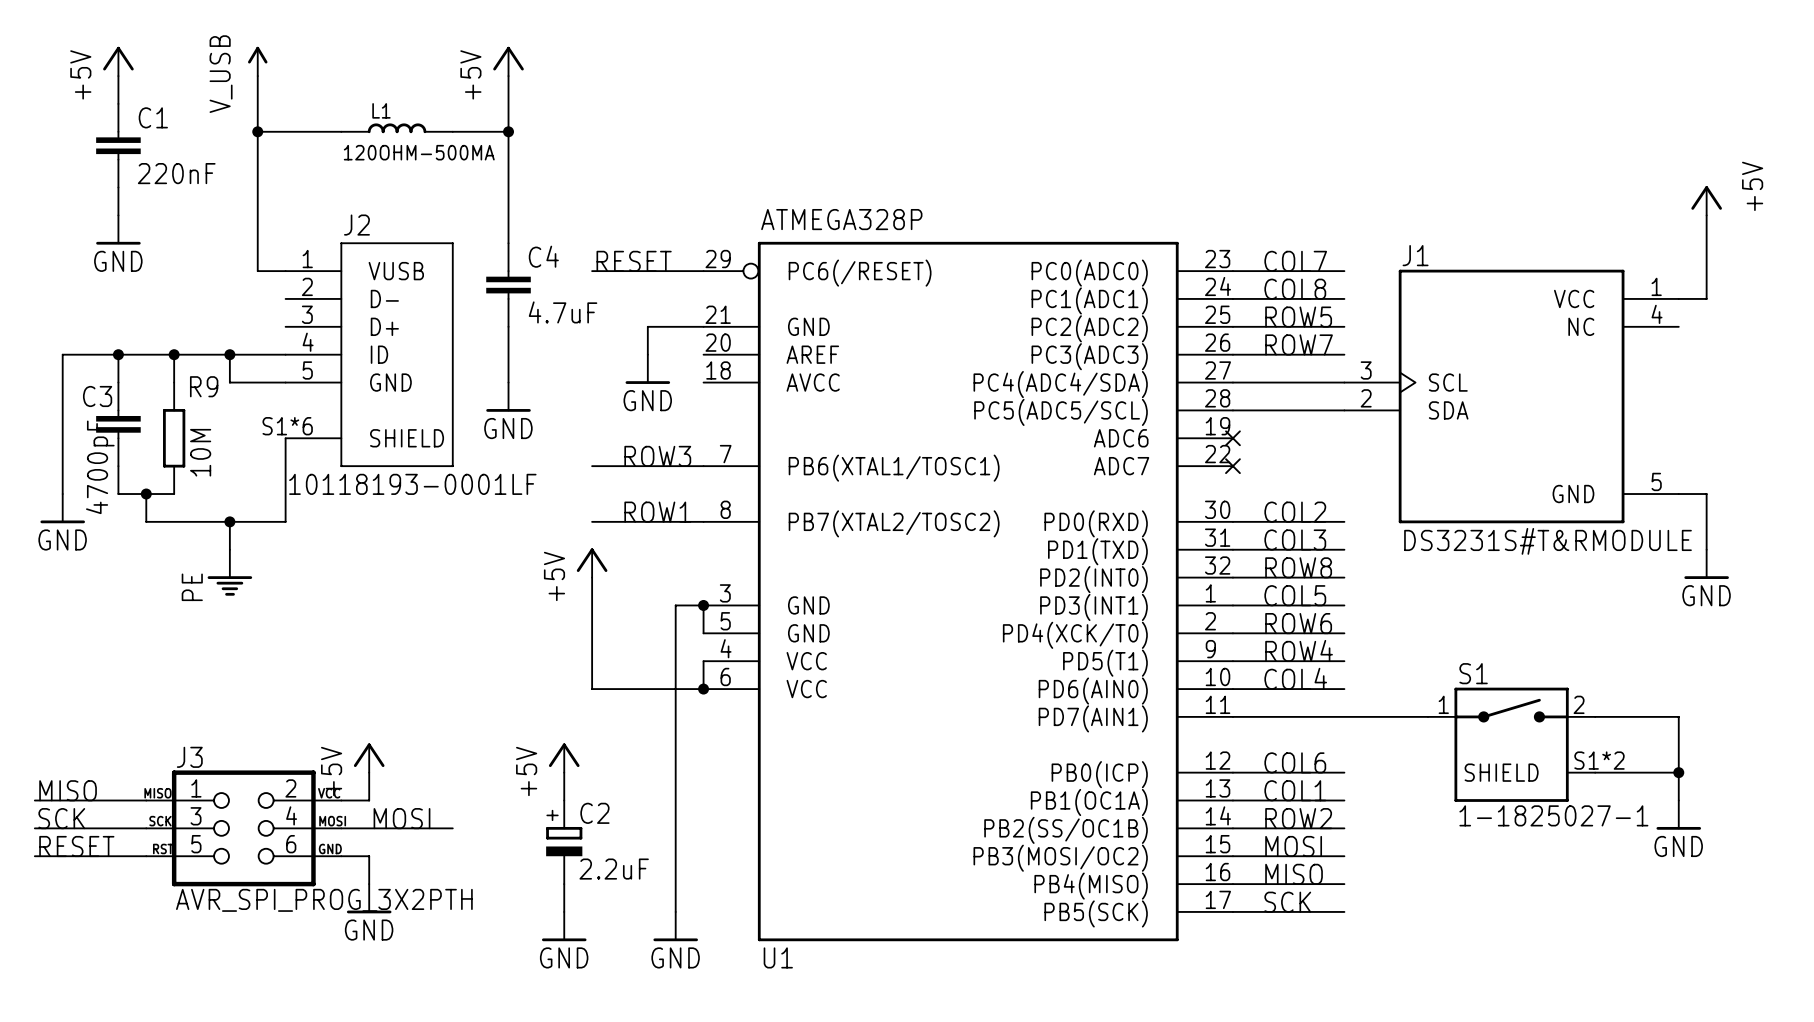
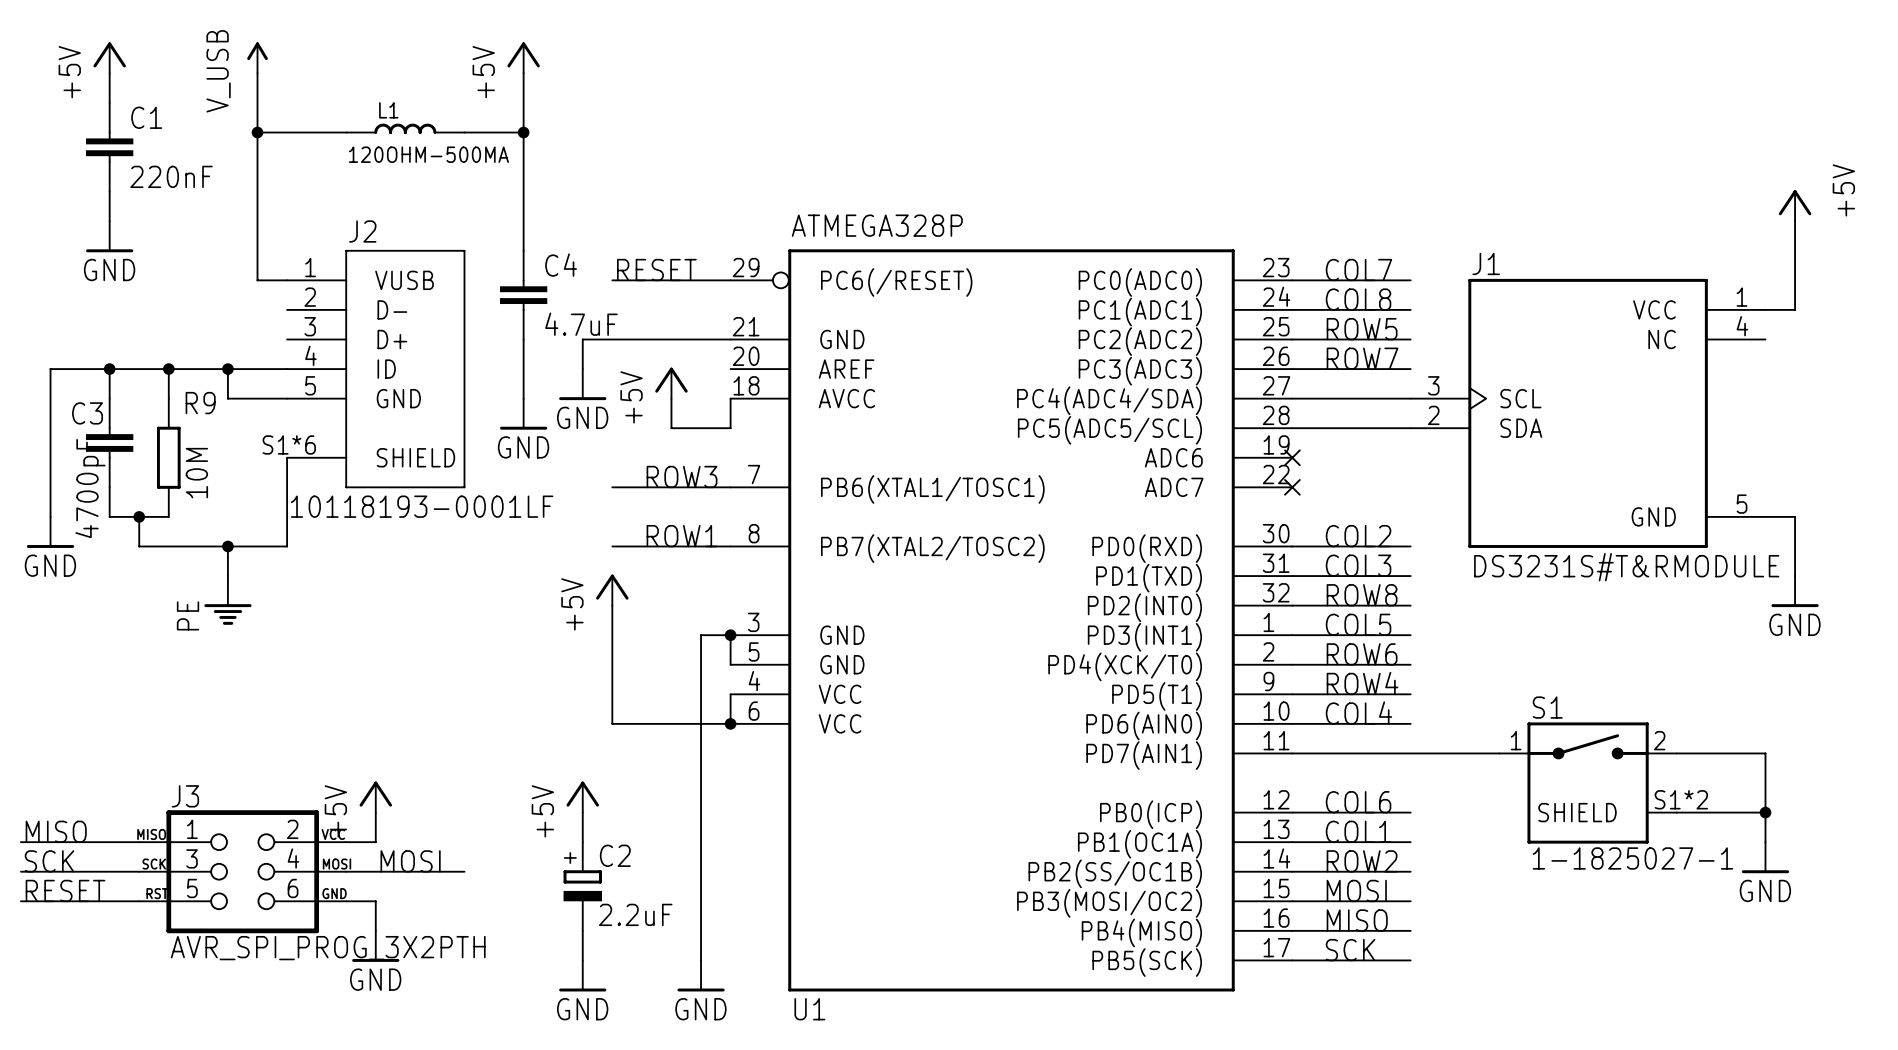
wire: (647, 326) (647, 354) -> (671, 339) (582, 339) (582, 369)
power symbol: none -> GND (582, 384)
power symbol: GND (647, 369) -> +5V (671, 383)
wire: none -> (671, 398) (671, 428) (730, 428) (730, 398)

